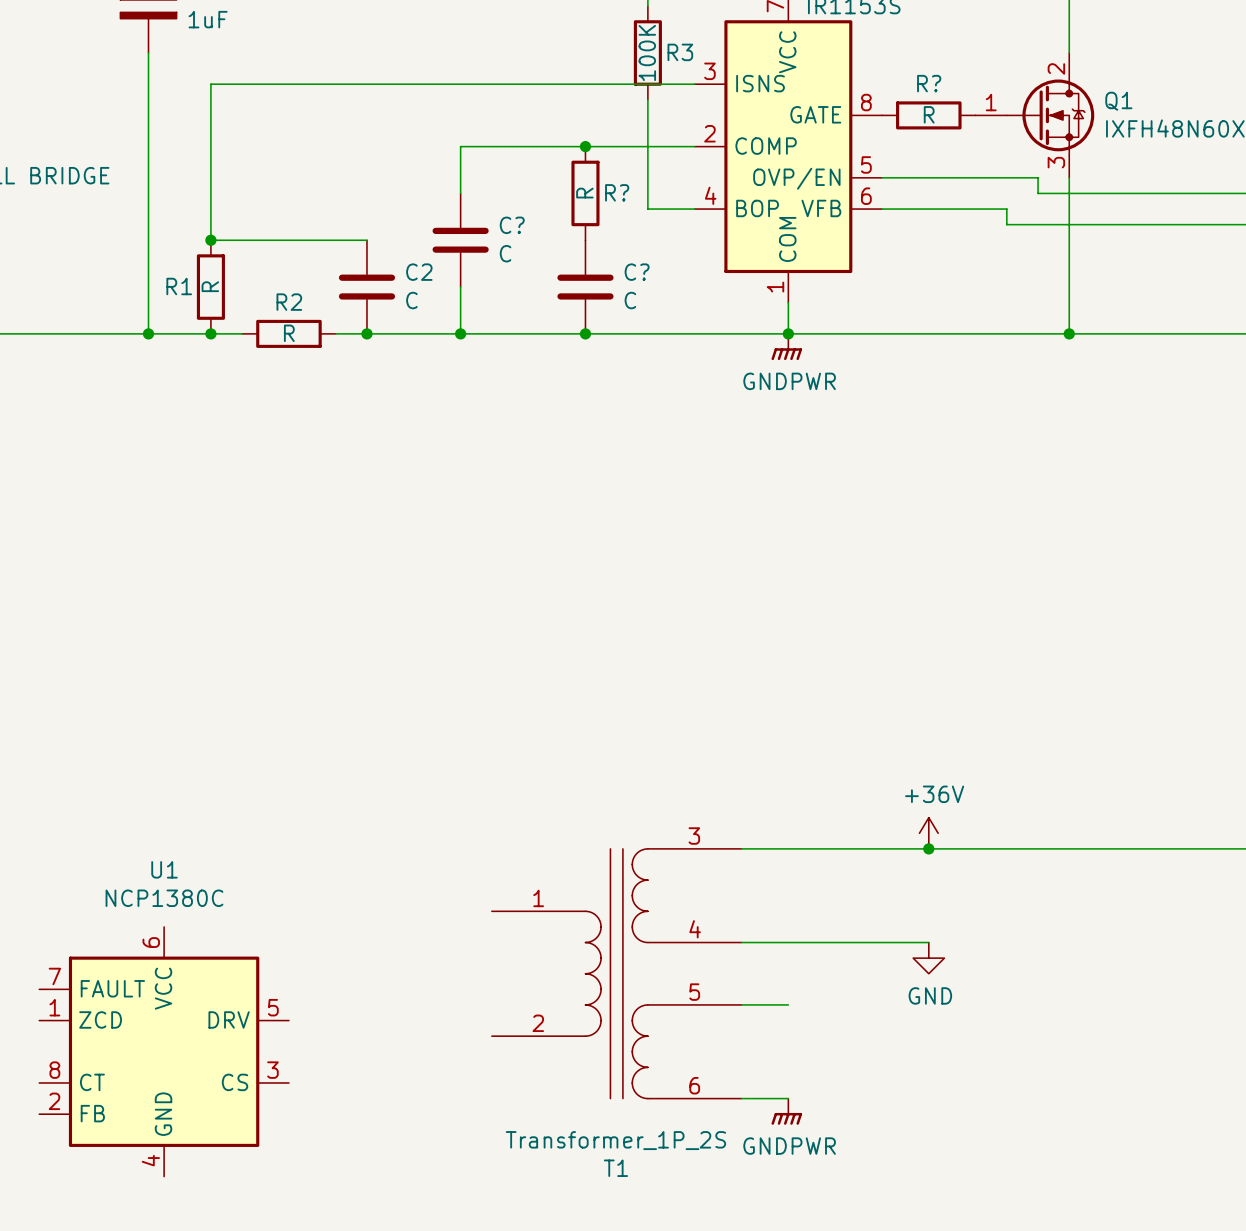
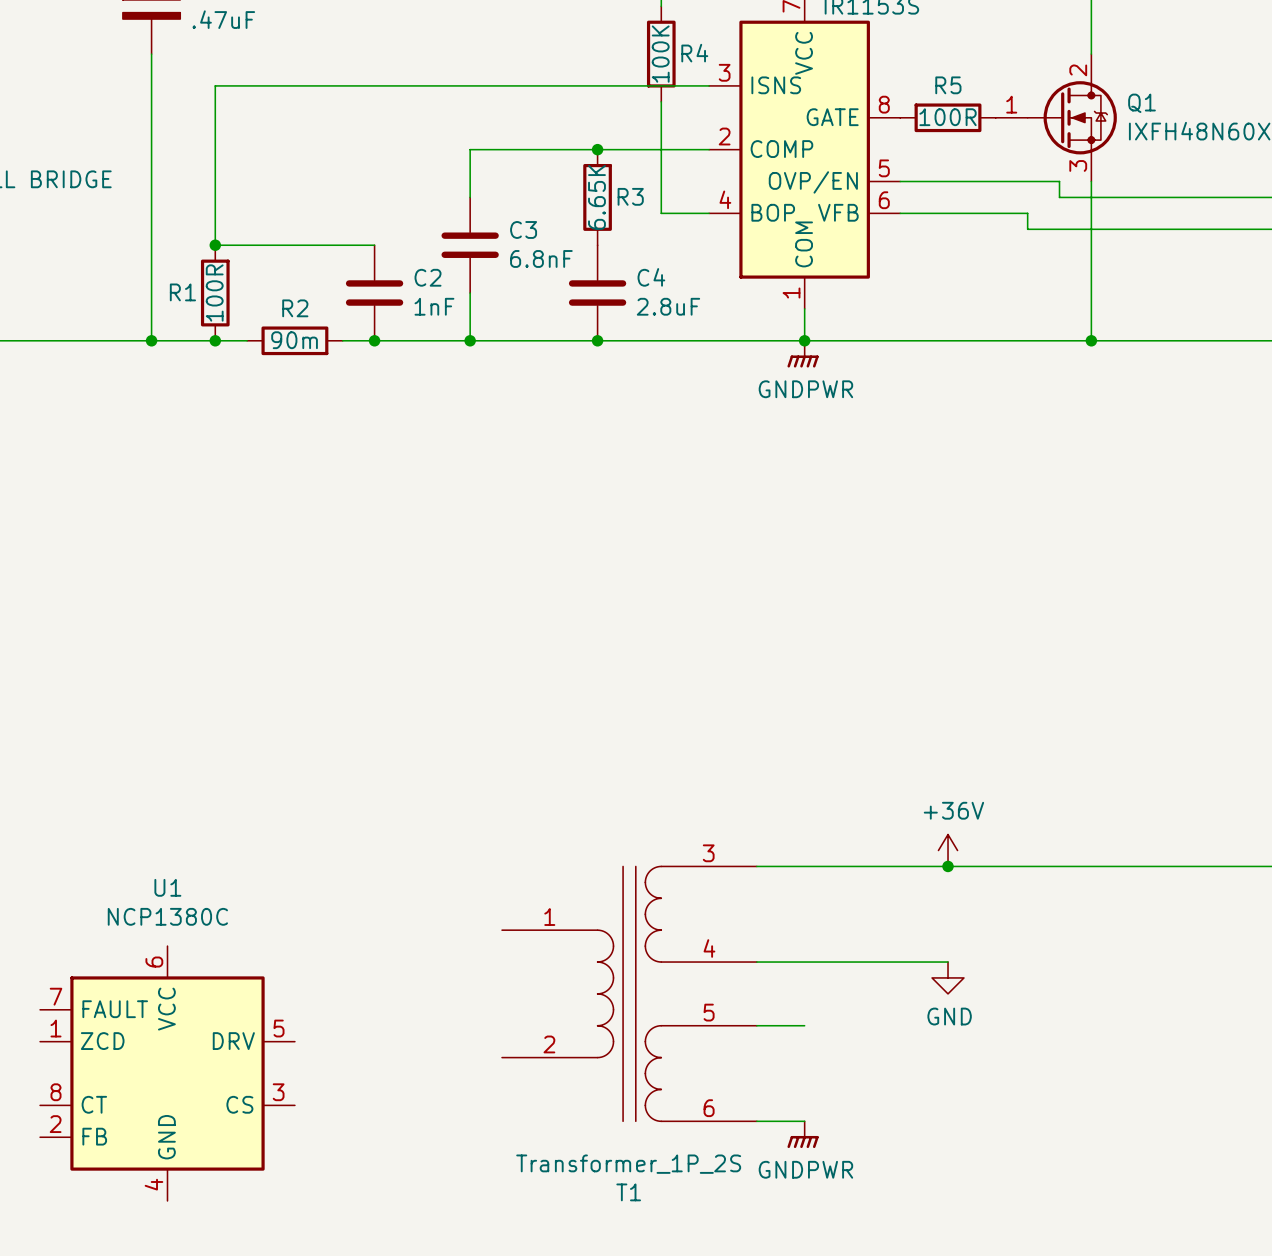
part value: 1uF (208, 19) -> .47uF (223, 19)
R3 name: R3 (680, 52) -> R4 (694, 53)
R? name: R? (929, 83) -> R5 (948, 85)
R? value: R (929, 114) -> 100R (948, 117)
R? name: R? (617, 192) -> R3 (630, 196)
R? value: R (584, 193) -> 6.65K (596, 197)
C? name: C? (512, 225) -> C3 (523, 229)
C? value: C (505, 253) -> 6.8nF (541, 258)
C? name: C? (637, 272) -> C4 (651, 277)
R1 value: R (210, 286) -> 100R (214, 293)
C2 value: C (411, 300) -> 1nF (434, 306)
C? value: C (630, 300) -> 2.8uF (668, 306)
R2 value: R (289, 333) -> 90m (294, 340)

